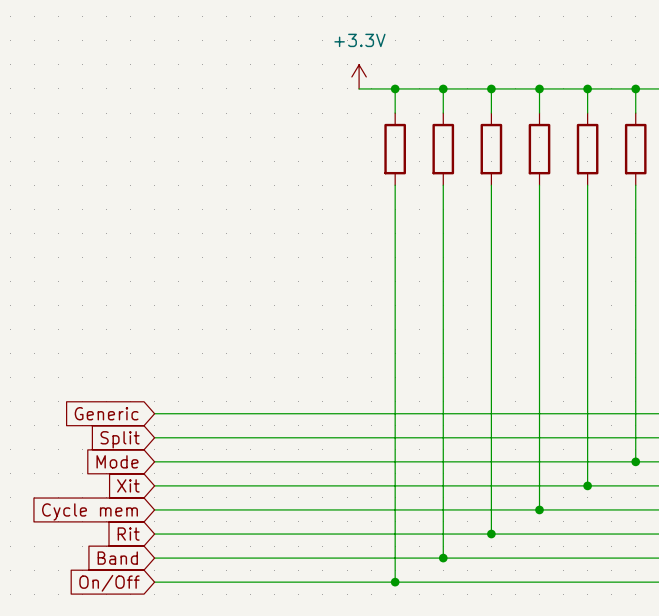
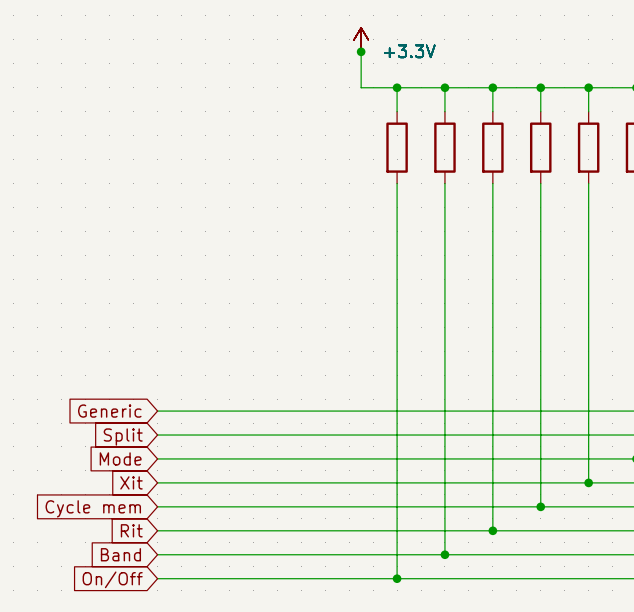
power symbol text position: +3.3V (359, 40) -> +3.3V (409, 51)
power symbol: none -> (361, 39)
junction: none -> (361, 51)
power symbol position: +3.3V (359, 76) -> +3.3V (361, 39)

